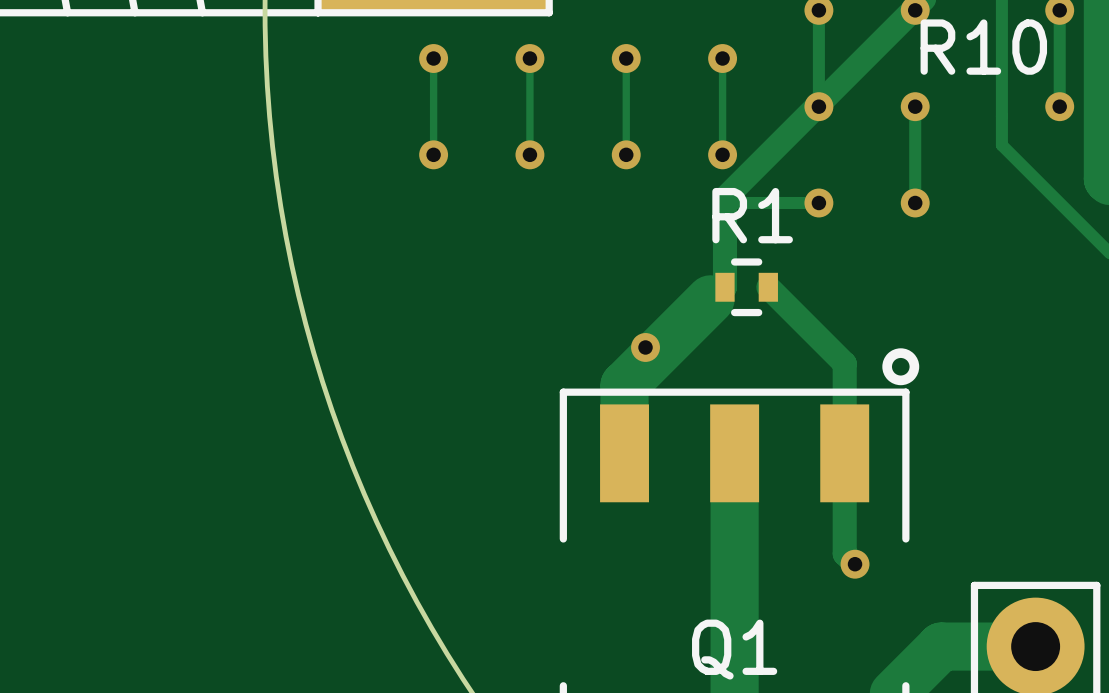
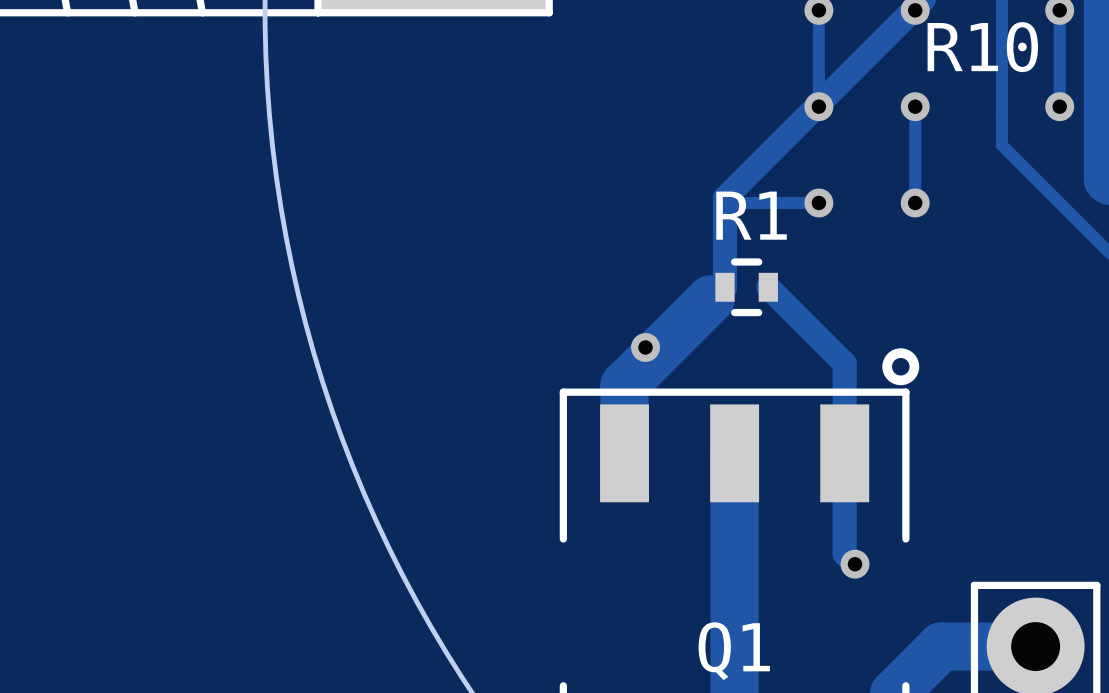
track: (433, 58) (433, 154) -> none
via: (433, 58) -> none
track: (529, 58) (529, 154) -> none
via: (529, 58) -> none
track: (626, 58) (626, 154) -> none
via: (626, 58) -> none
track: (722, 58) (722, 154) -> none
via: (722, 58) -> none
via: (433, 154) -> none
via: (529, 154) -> none
via: (626, 154) -> none
via: (722, 154) -> none

